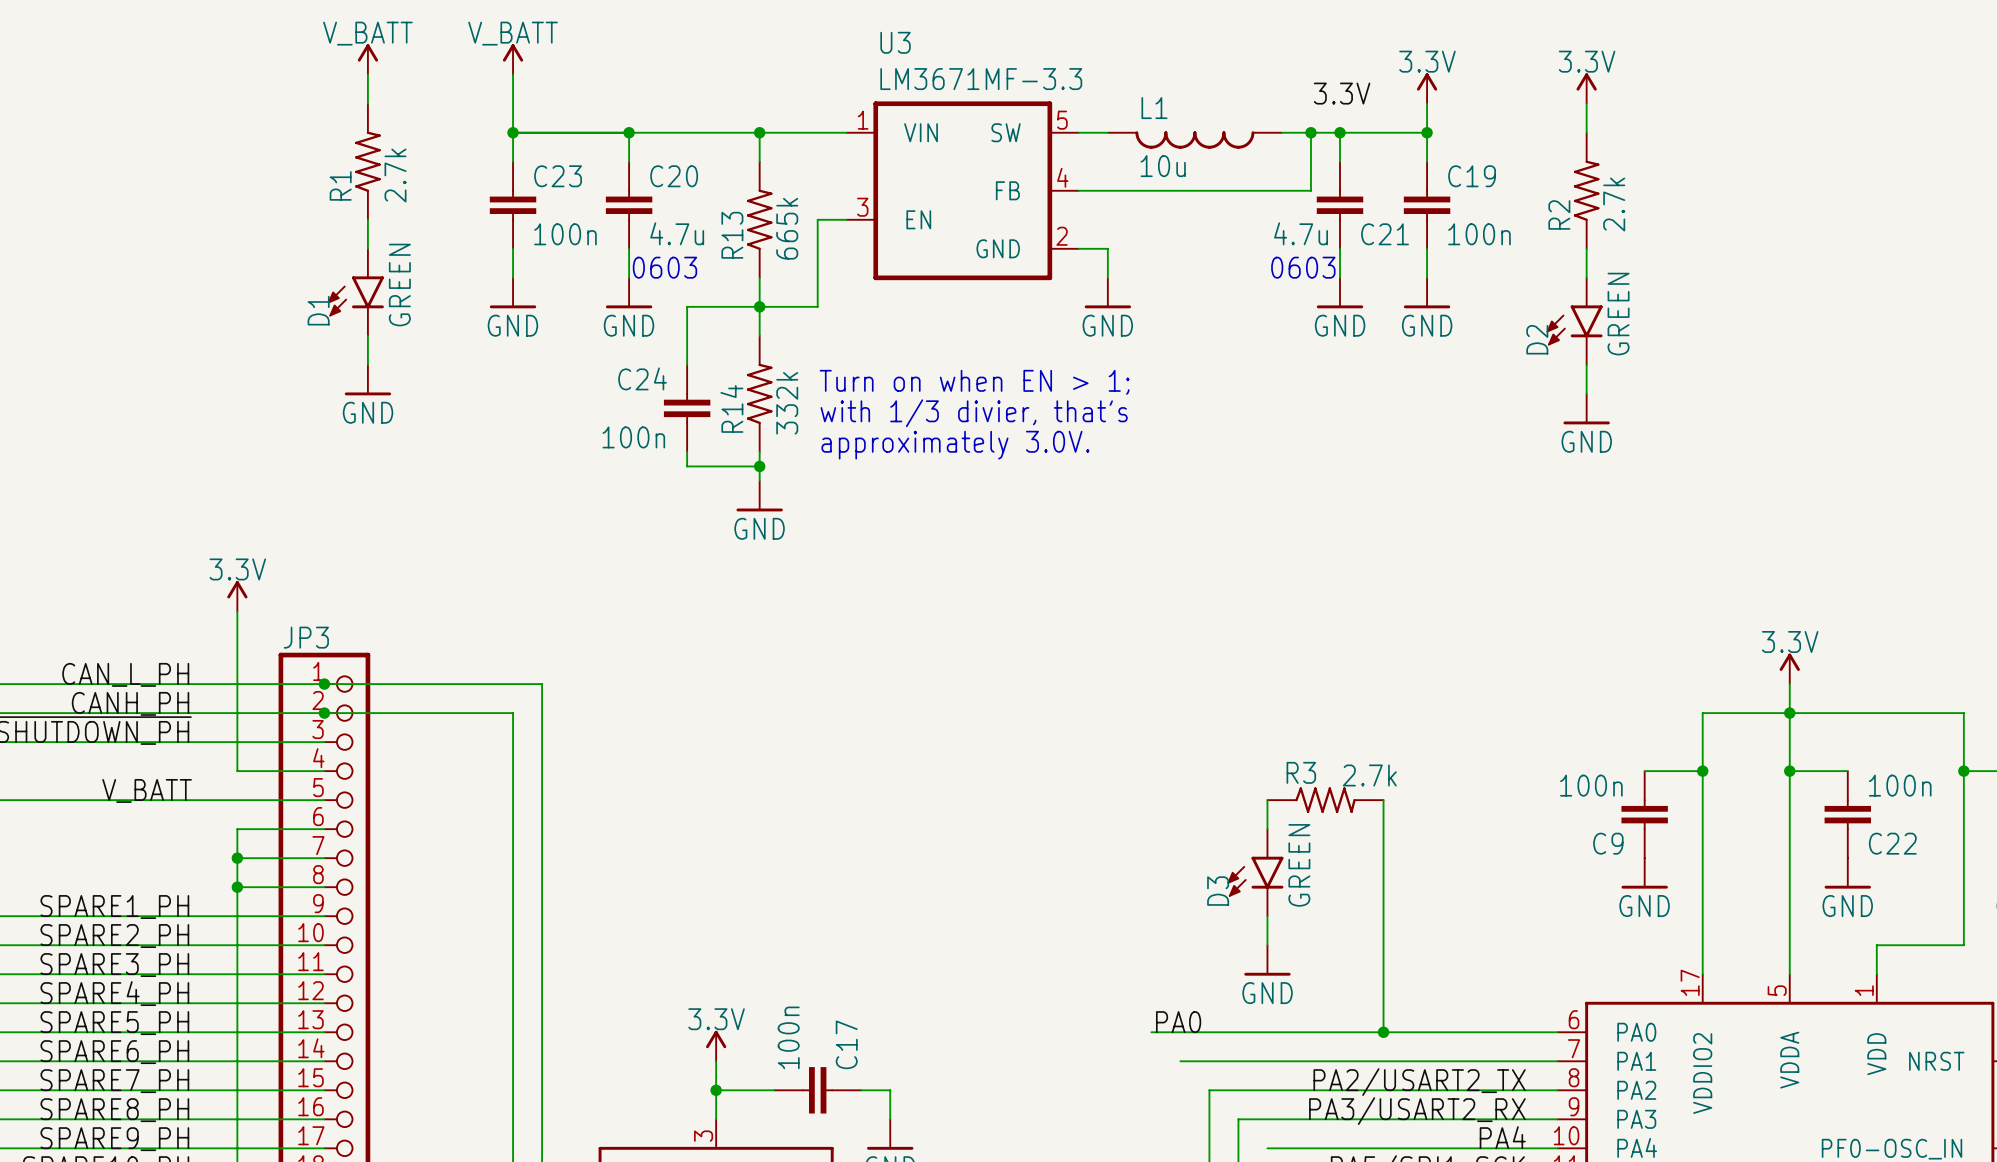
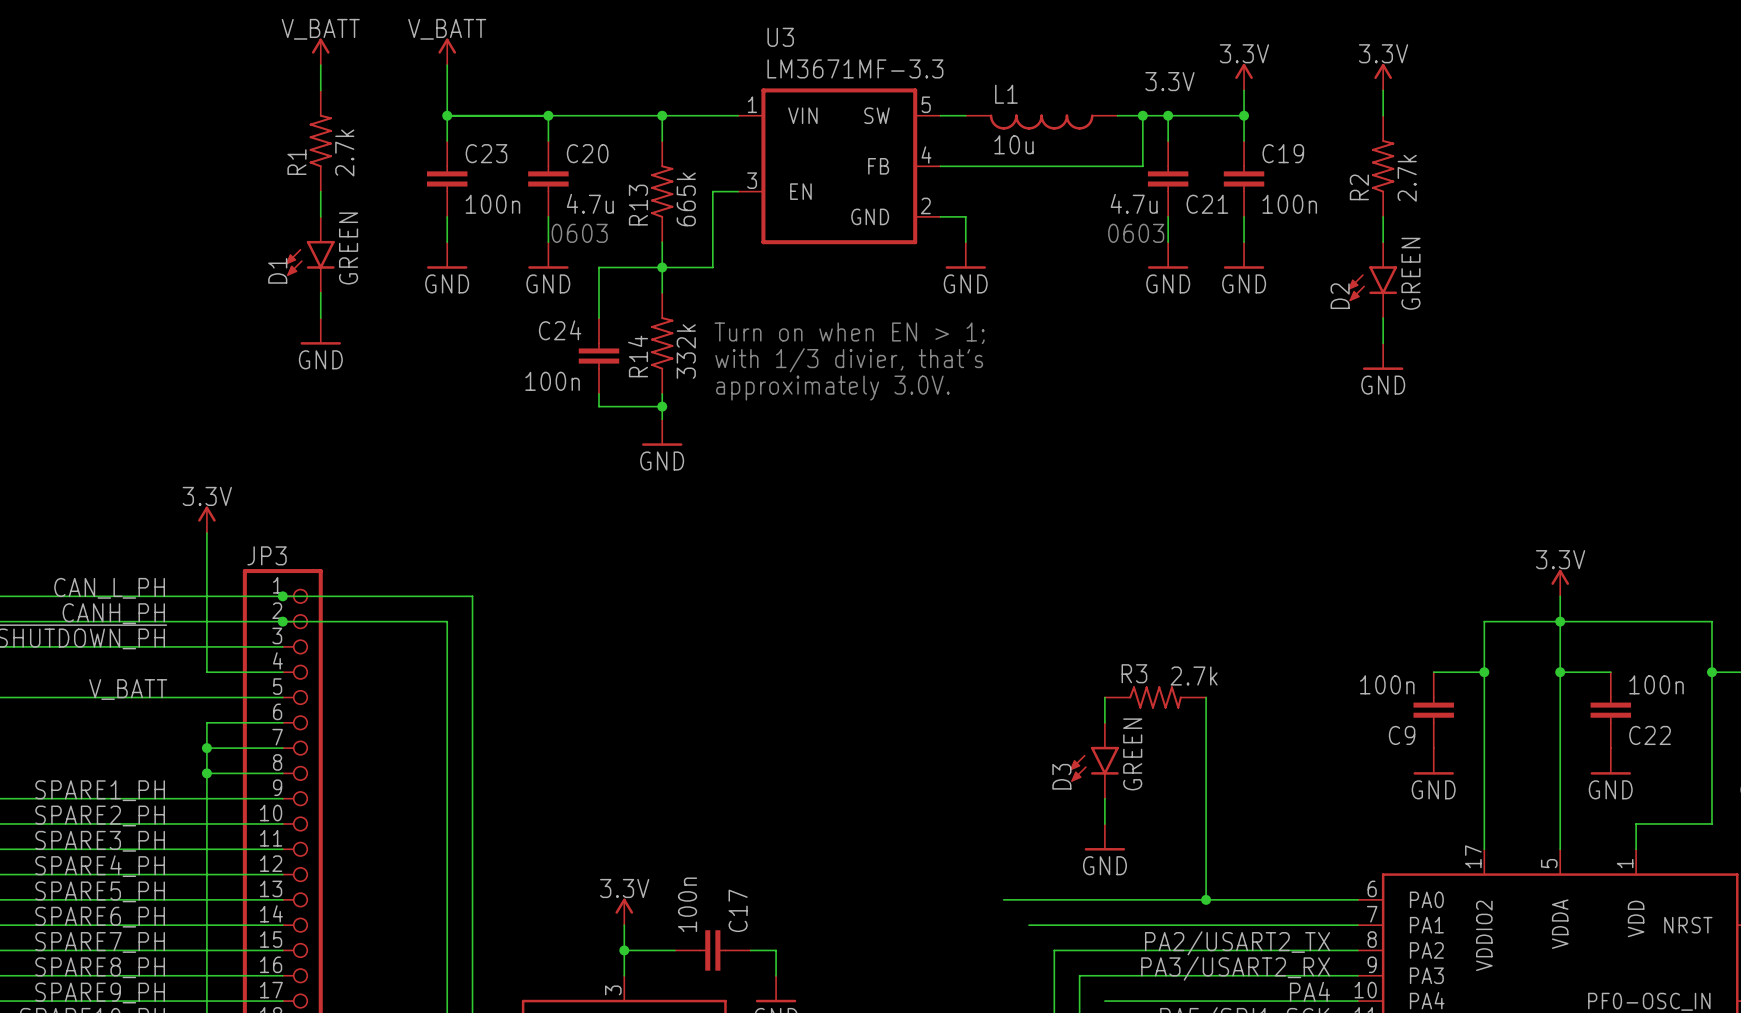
label: PA0 (1178, 1022) -> none

